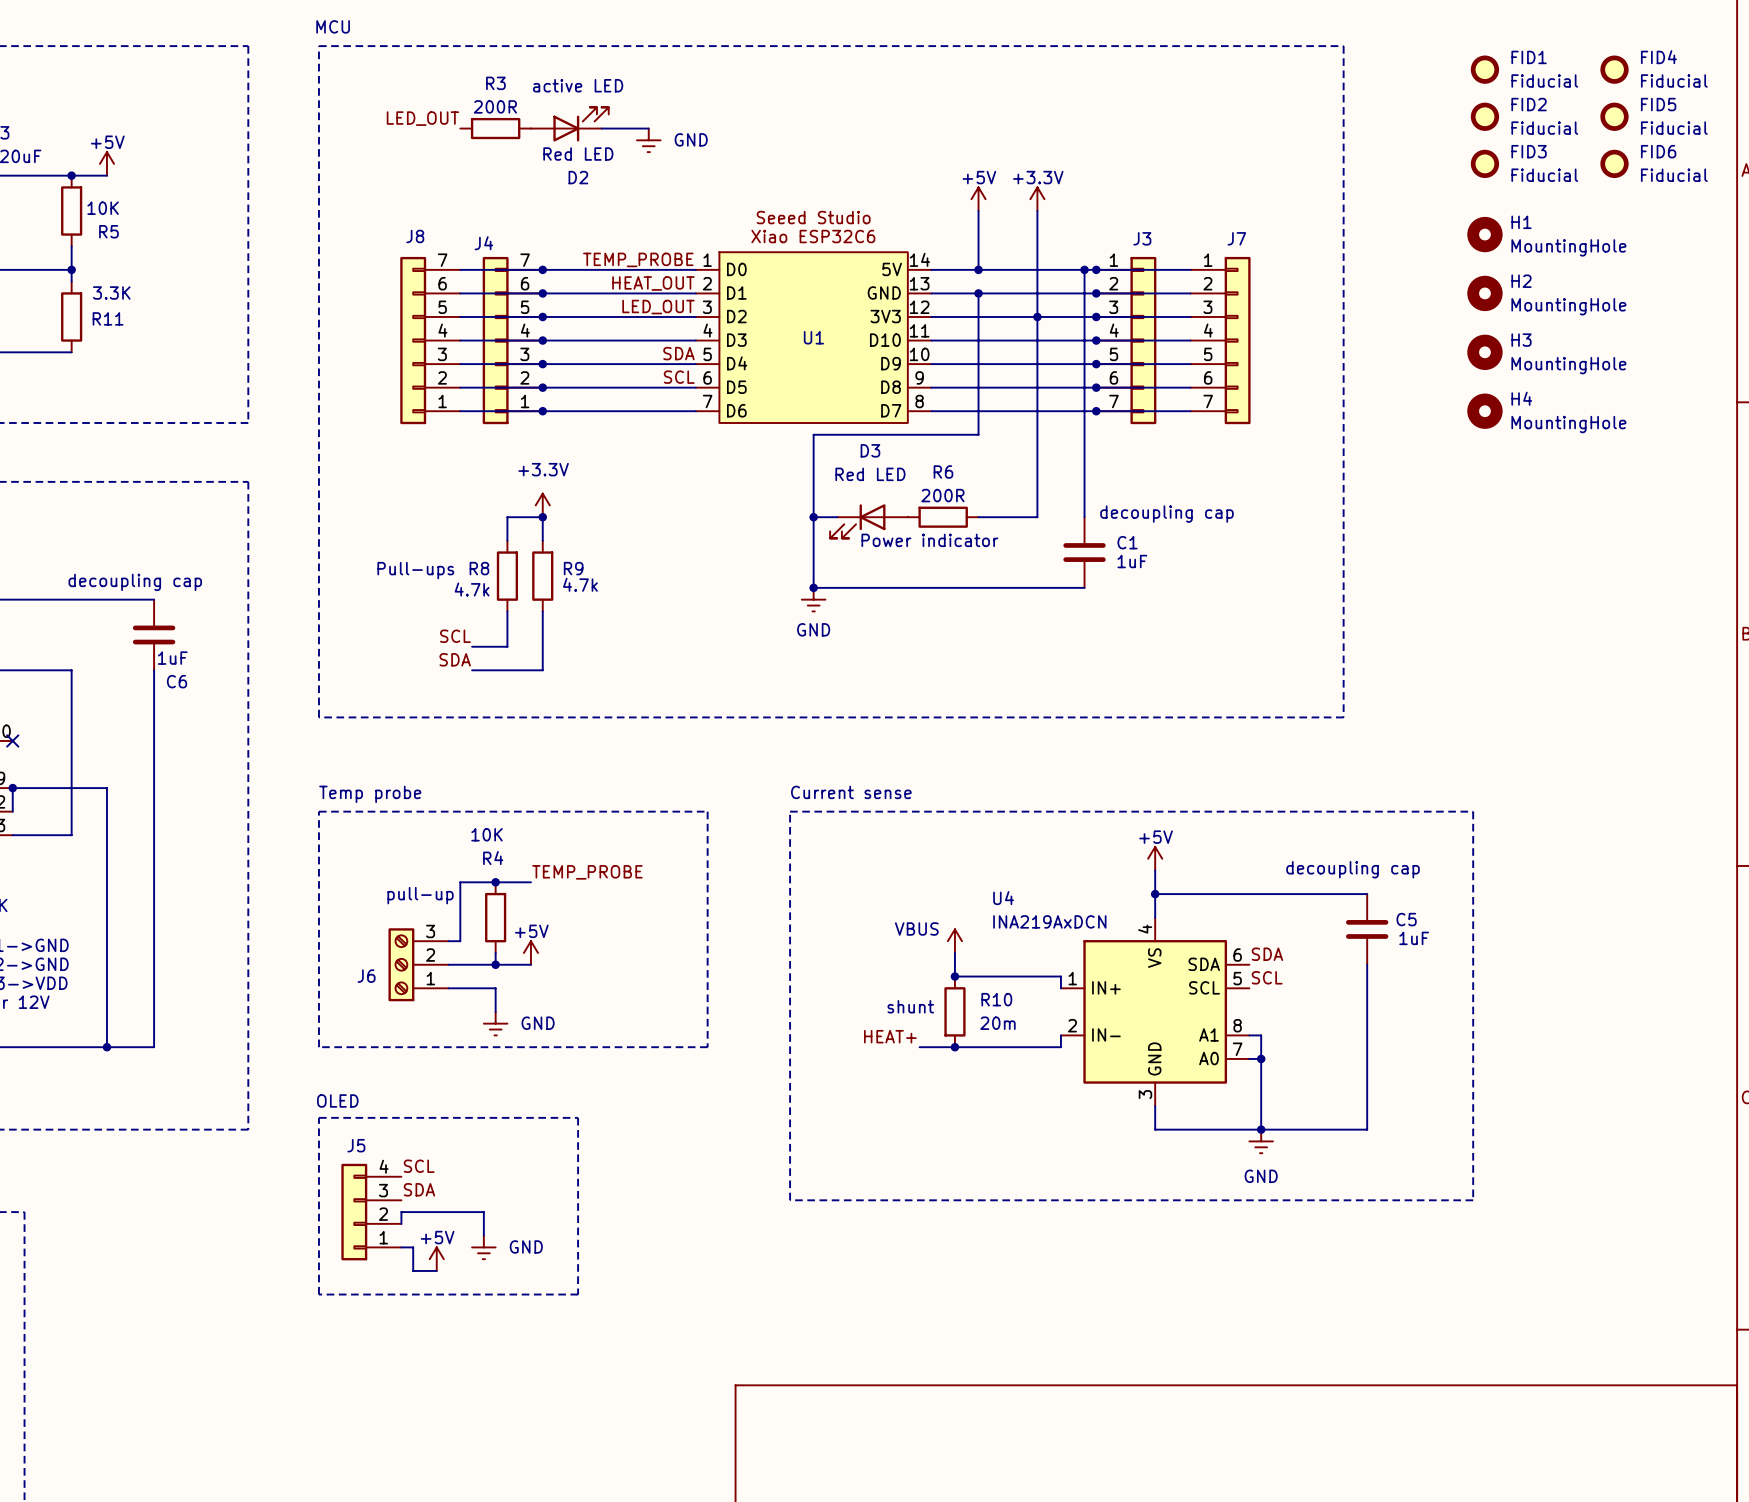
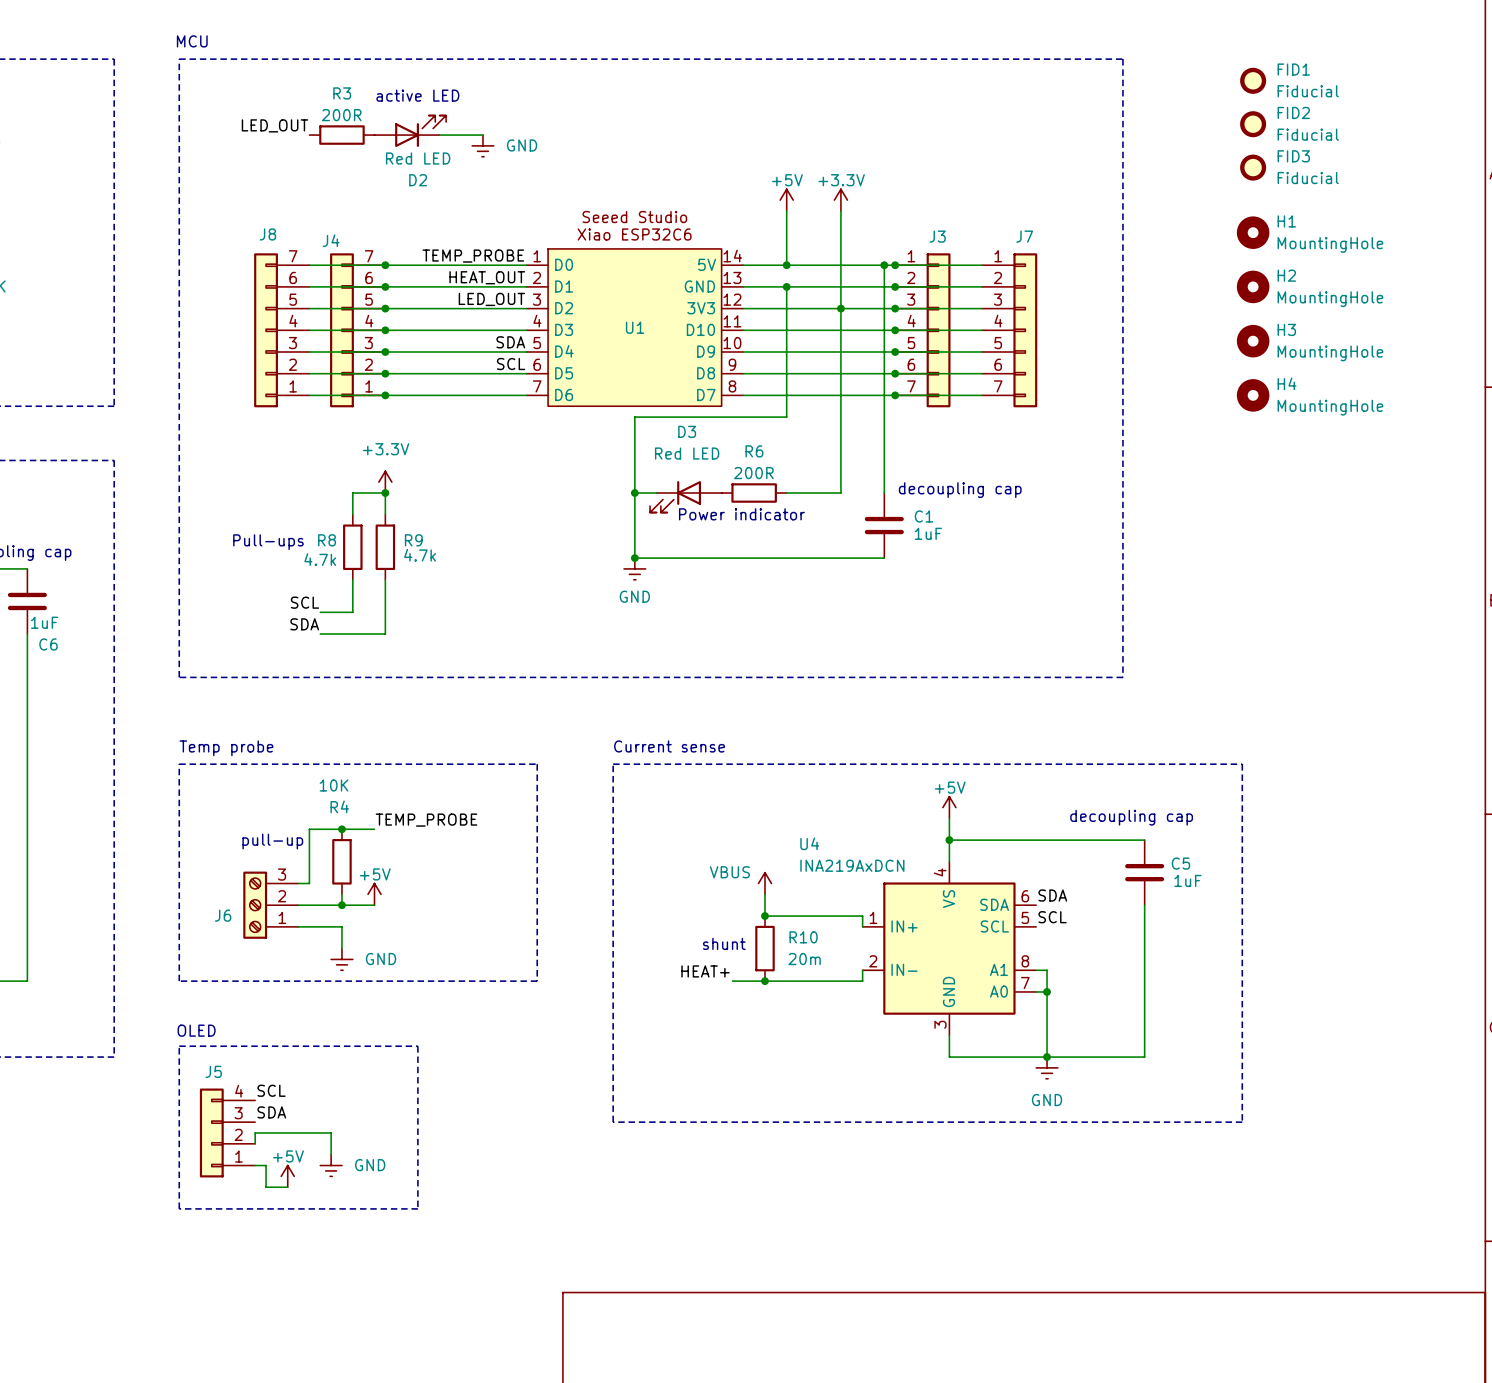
FID4: Fiducial (1614, 69) -> none
FID5: Fiducial (1614, 116) -> none
FID6: Fiducial (1614, 163) -> none

